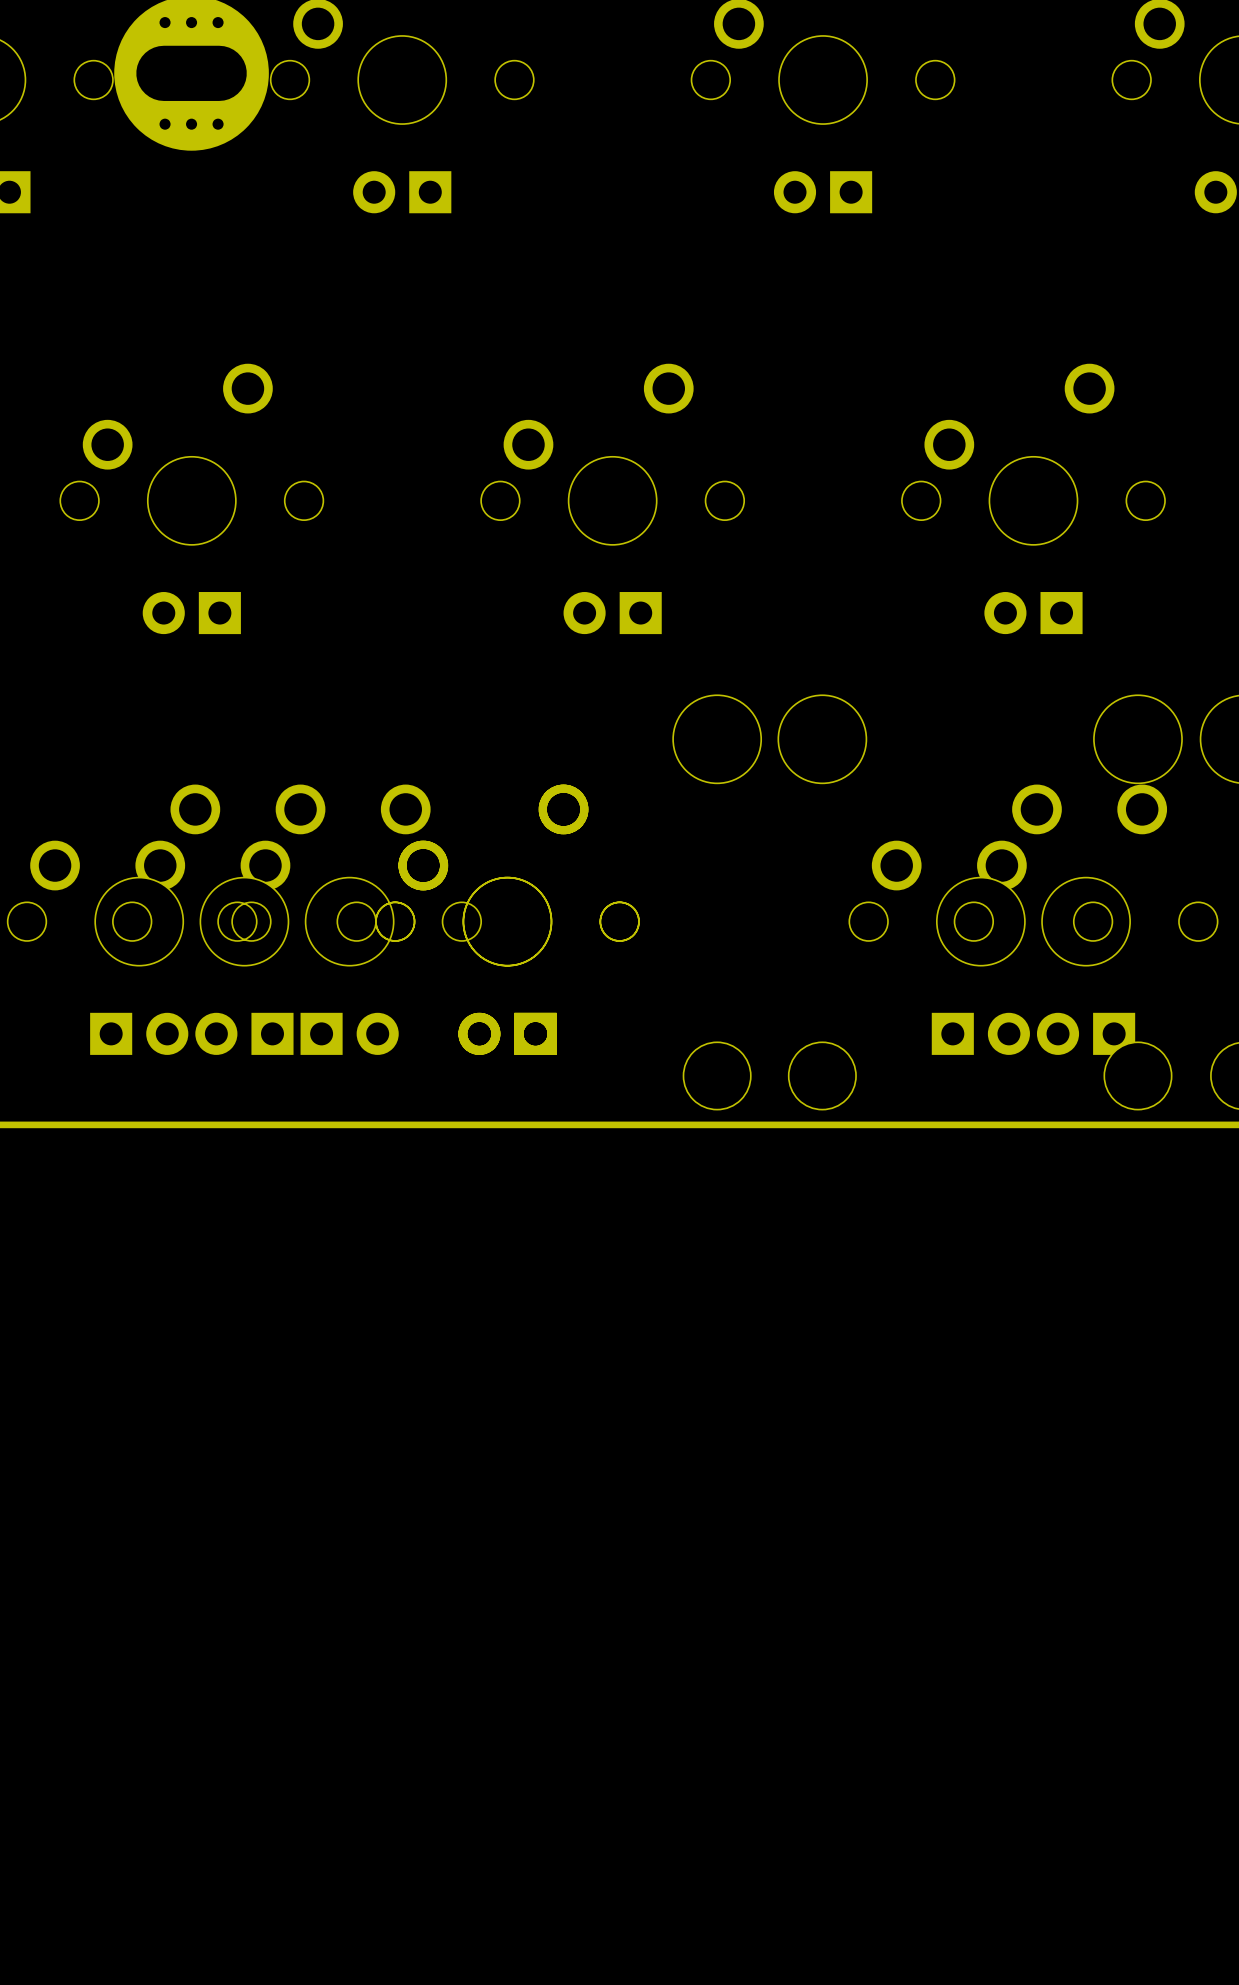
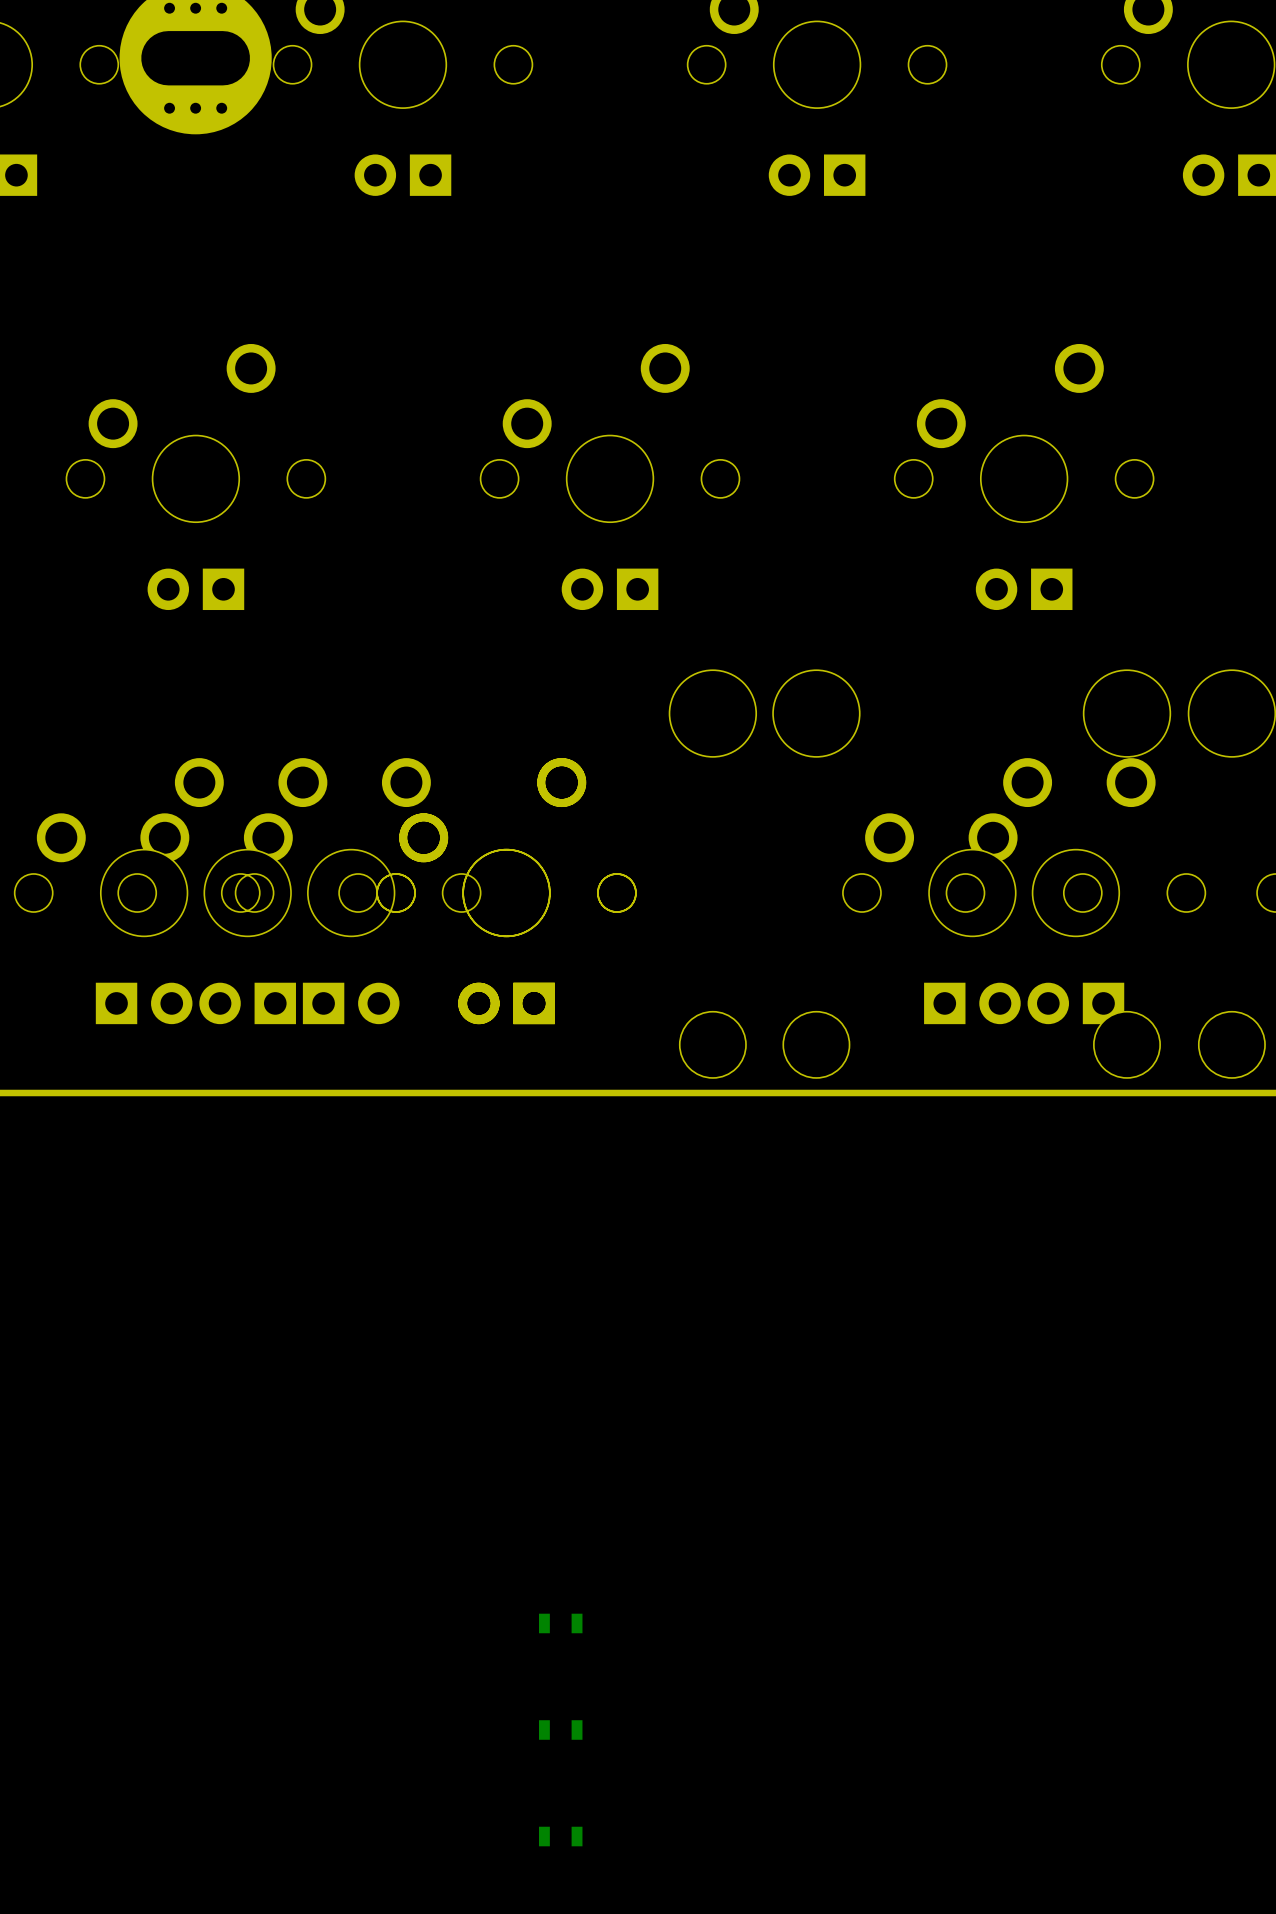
part: none -> (560, 1623)
part: none -> (560, 1730)
part: none -> (560, 1836)

